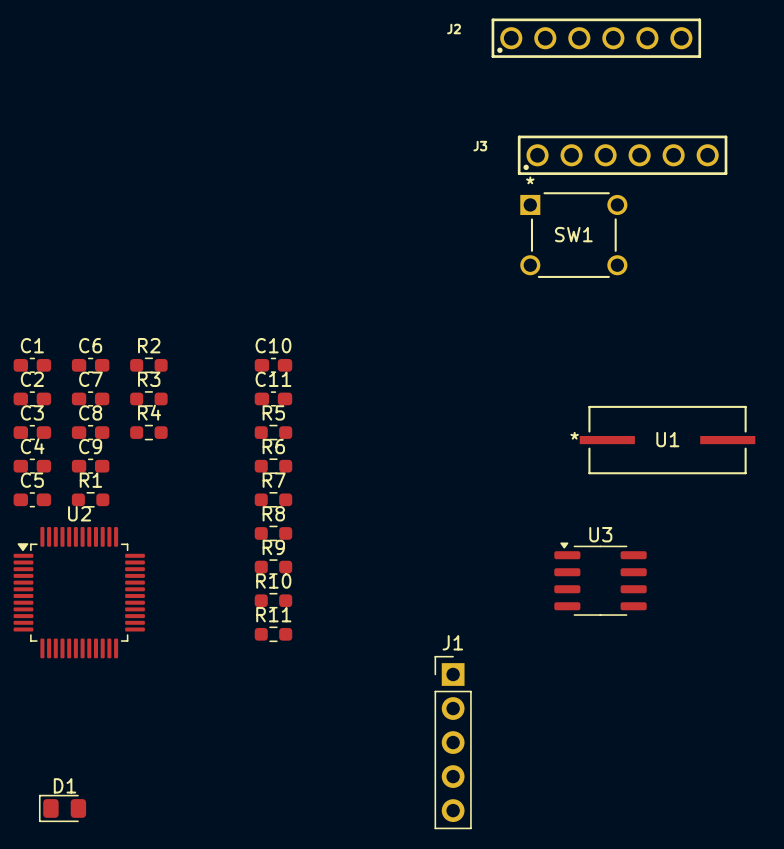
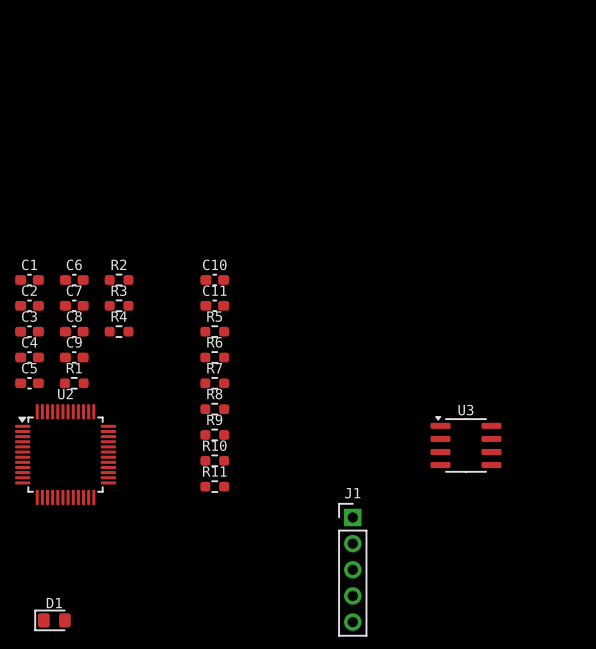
J2: (596, 38) -> none
J3: (622, 155) -> none
SW1: (573, 235) -> none
U1: (667, 440) -> none

